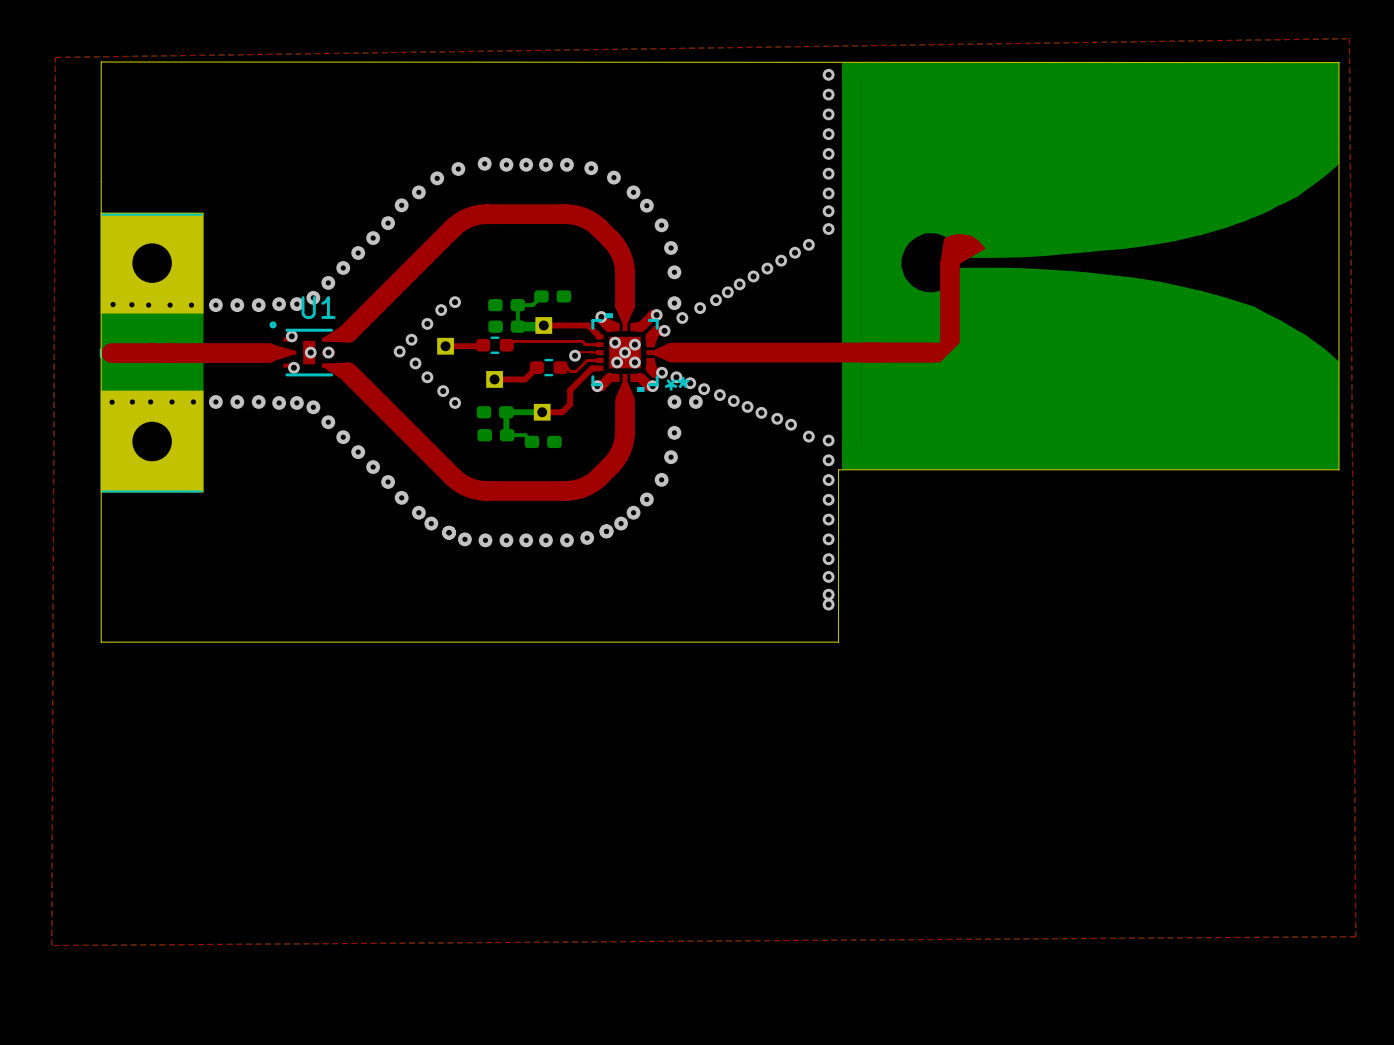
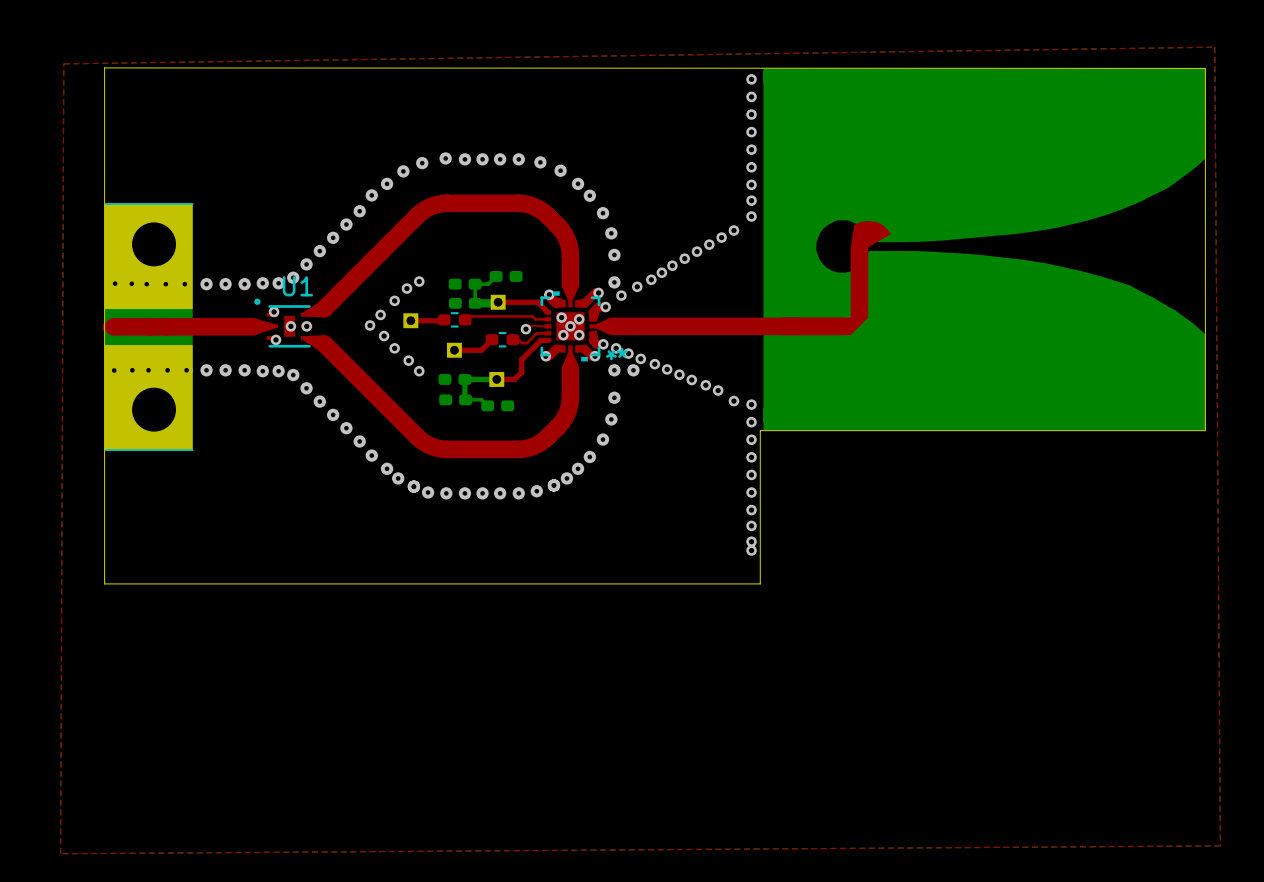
part footprint: [99, 212, 204, 493] -> [103, 203, 195, 451]

